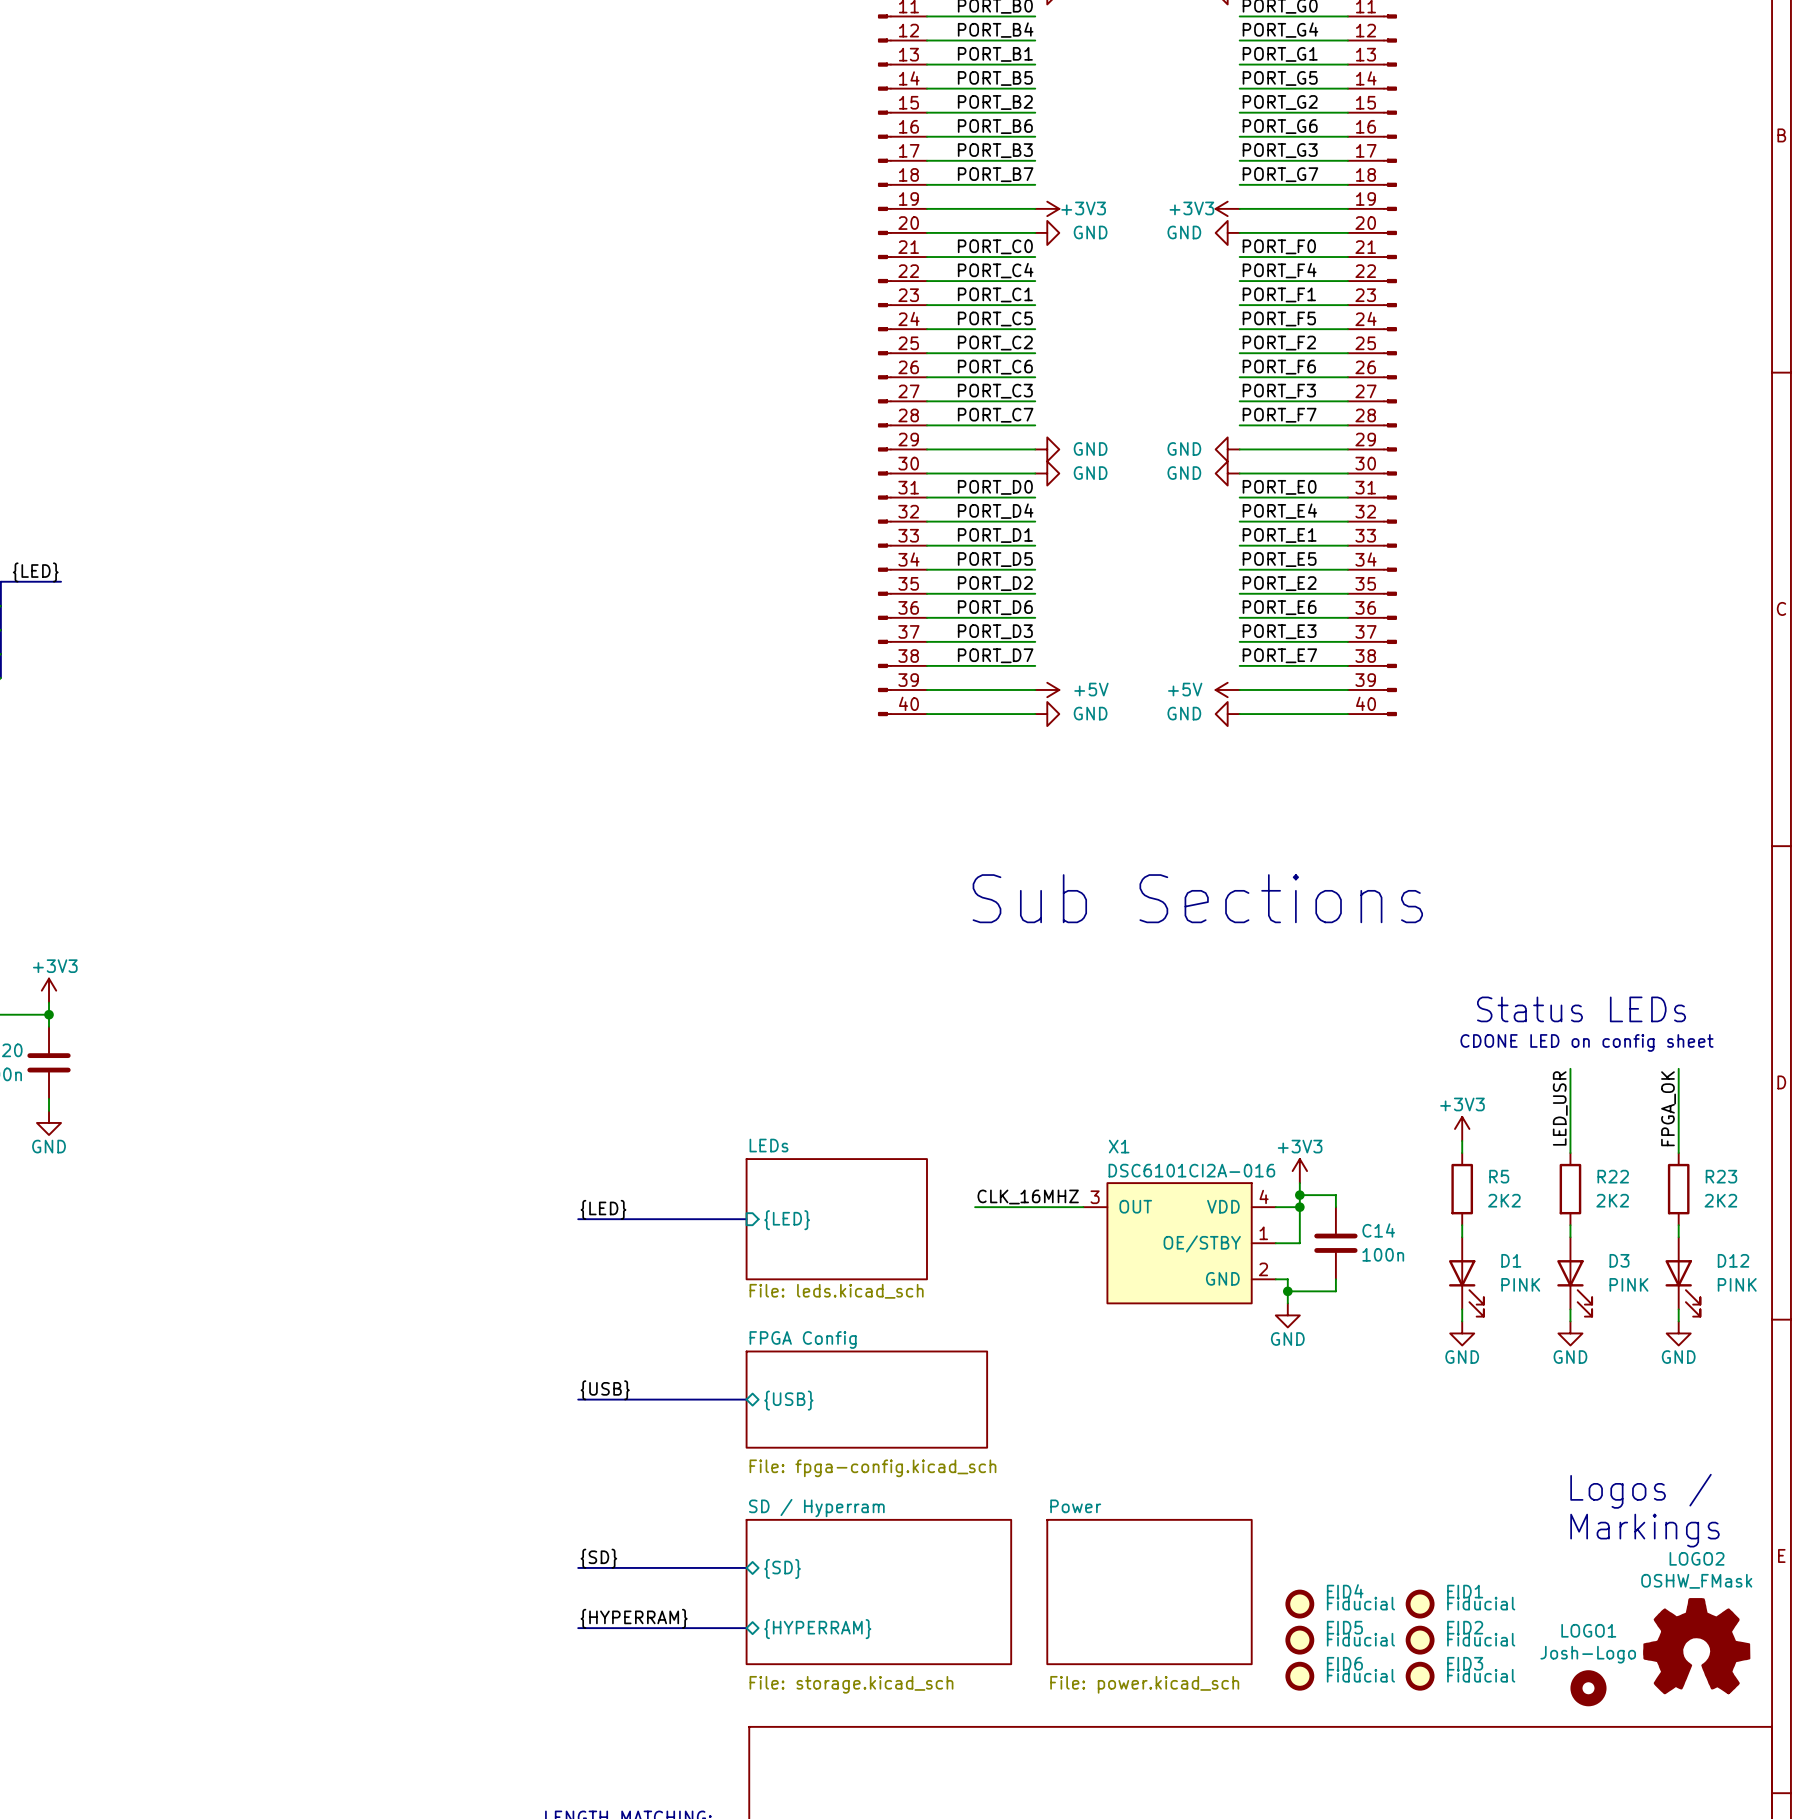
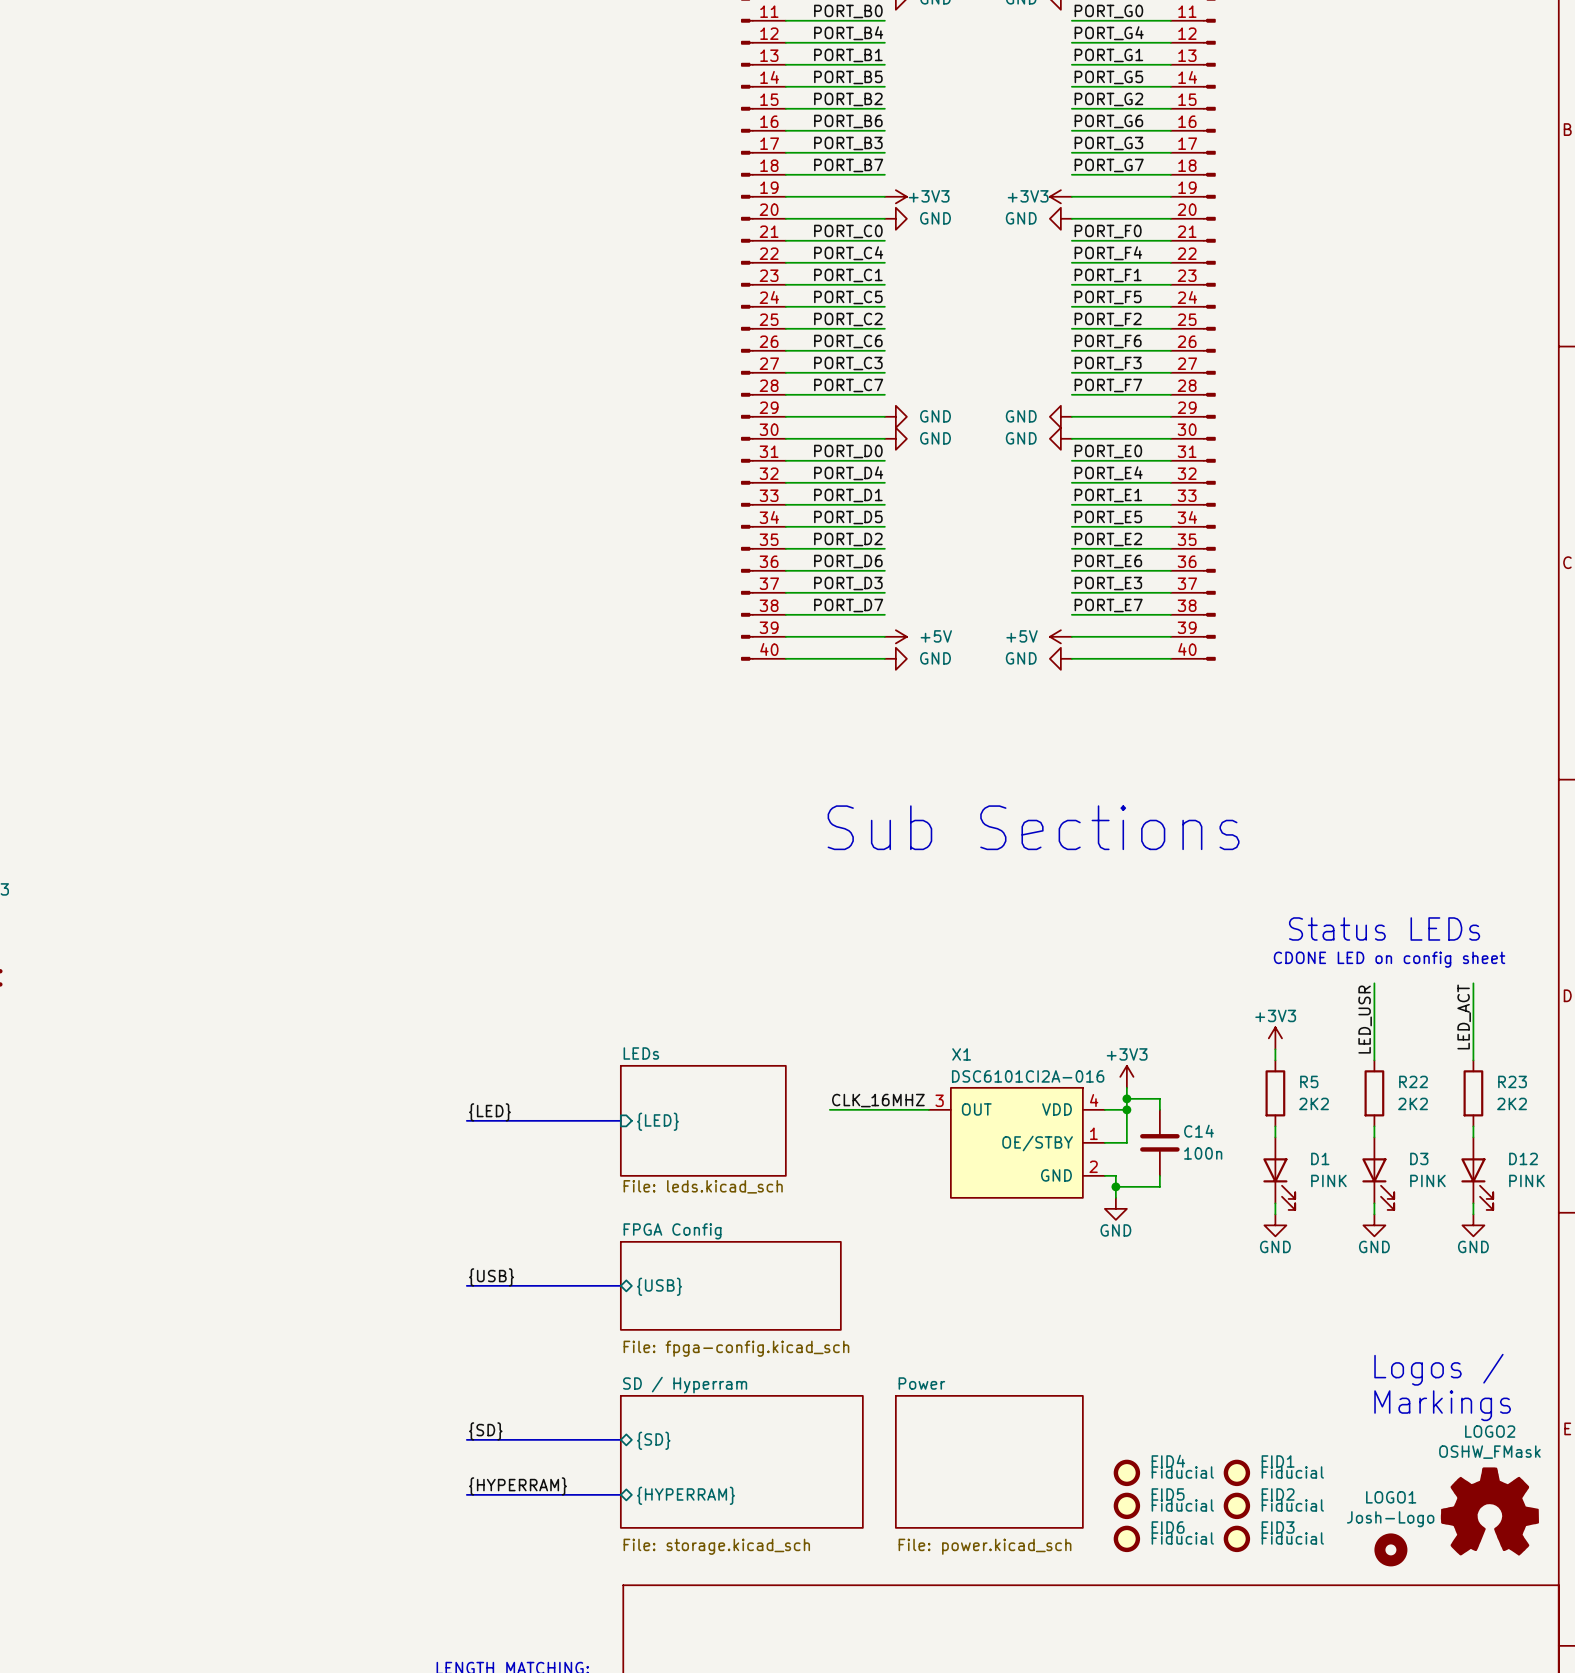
label: FPGA_OK (1668, 1108) -> LED_ACT (1464, 1016)

